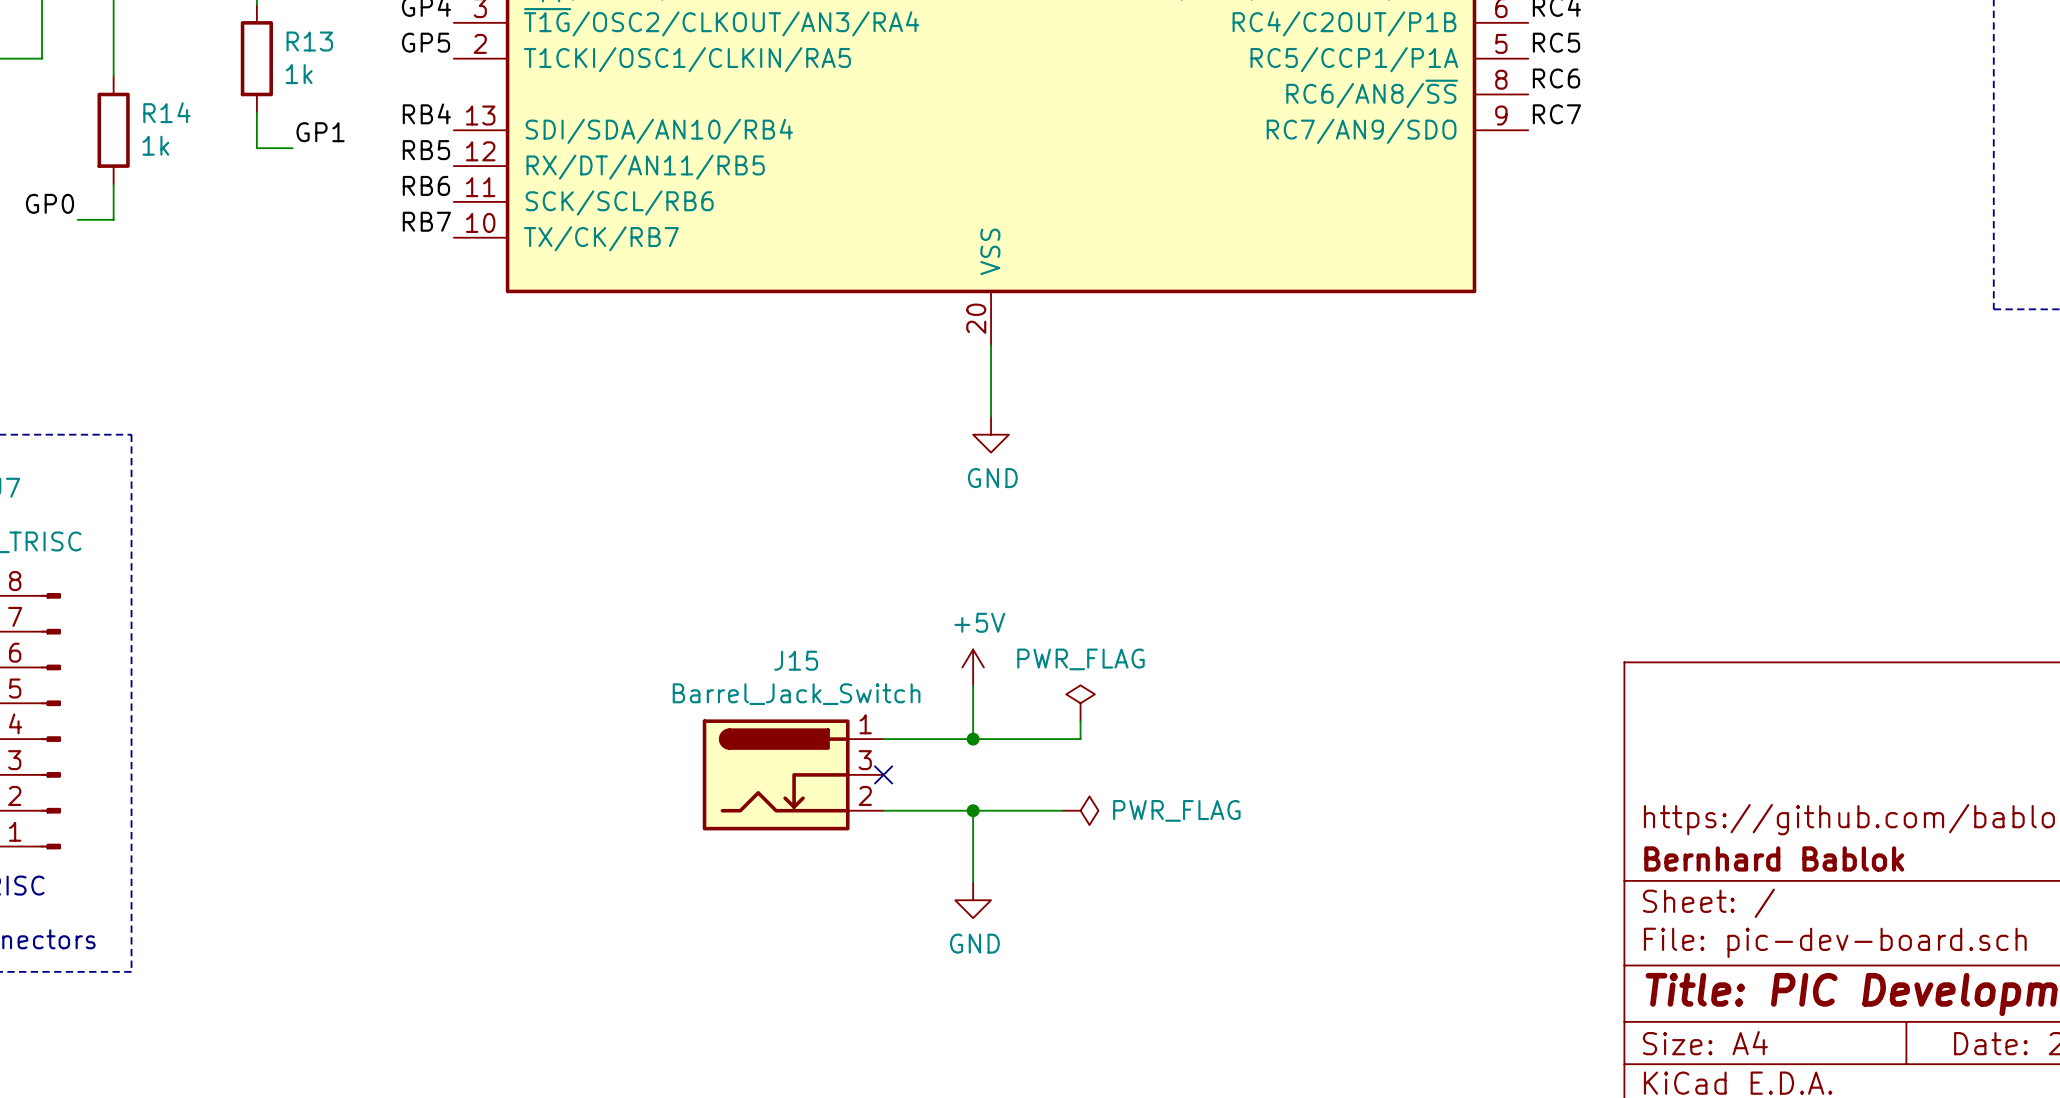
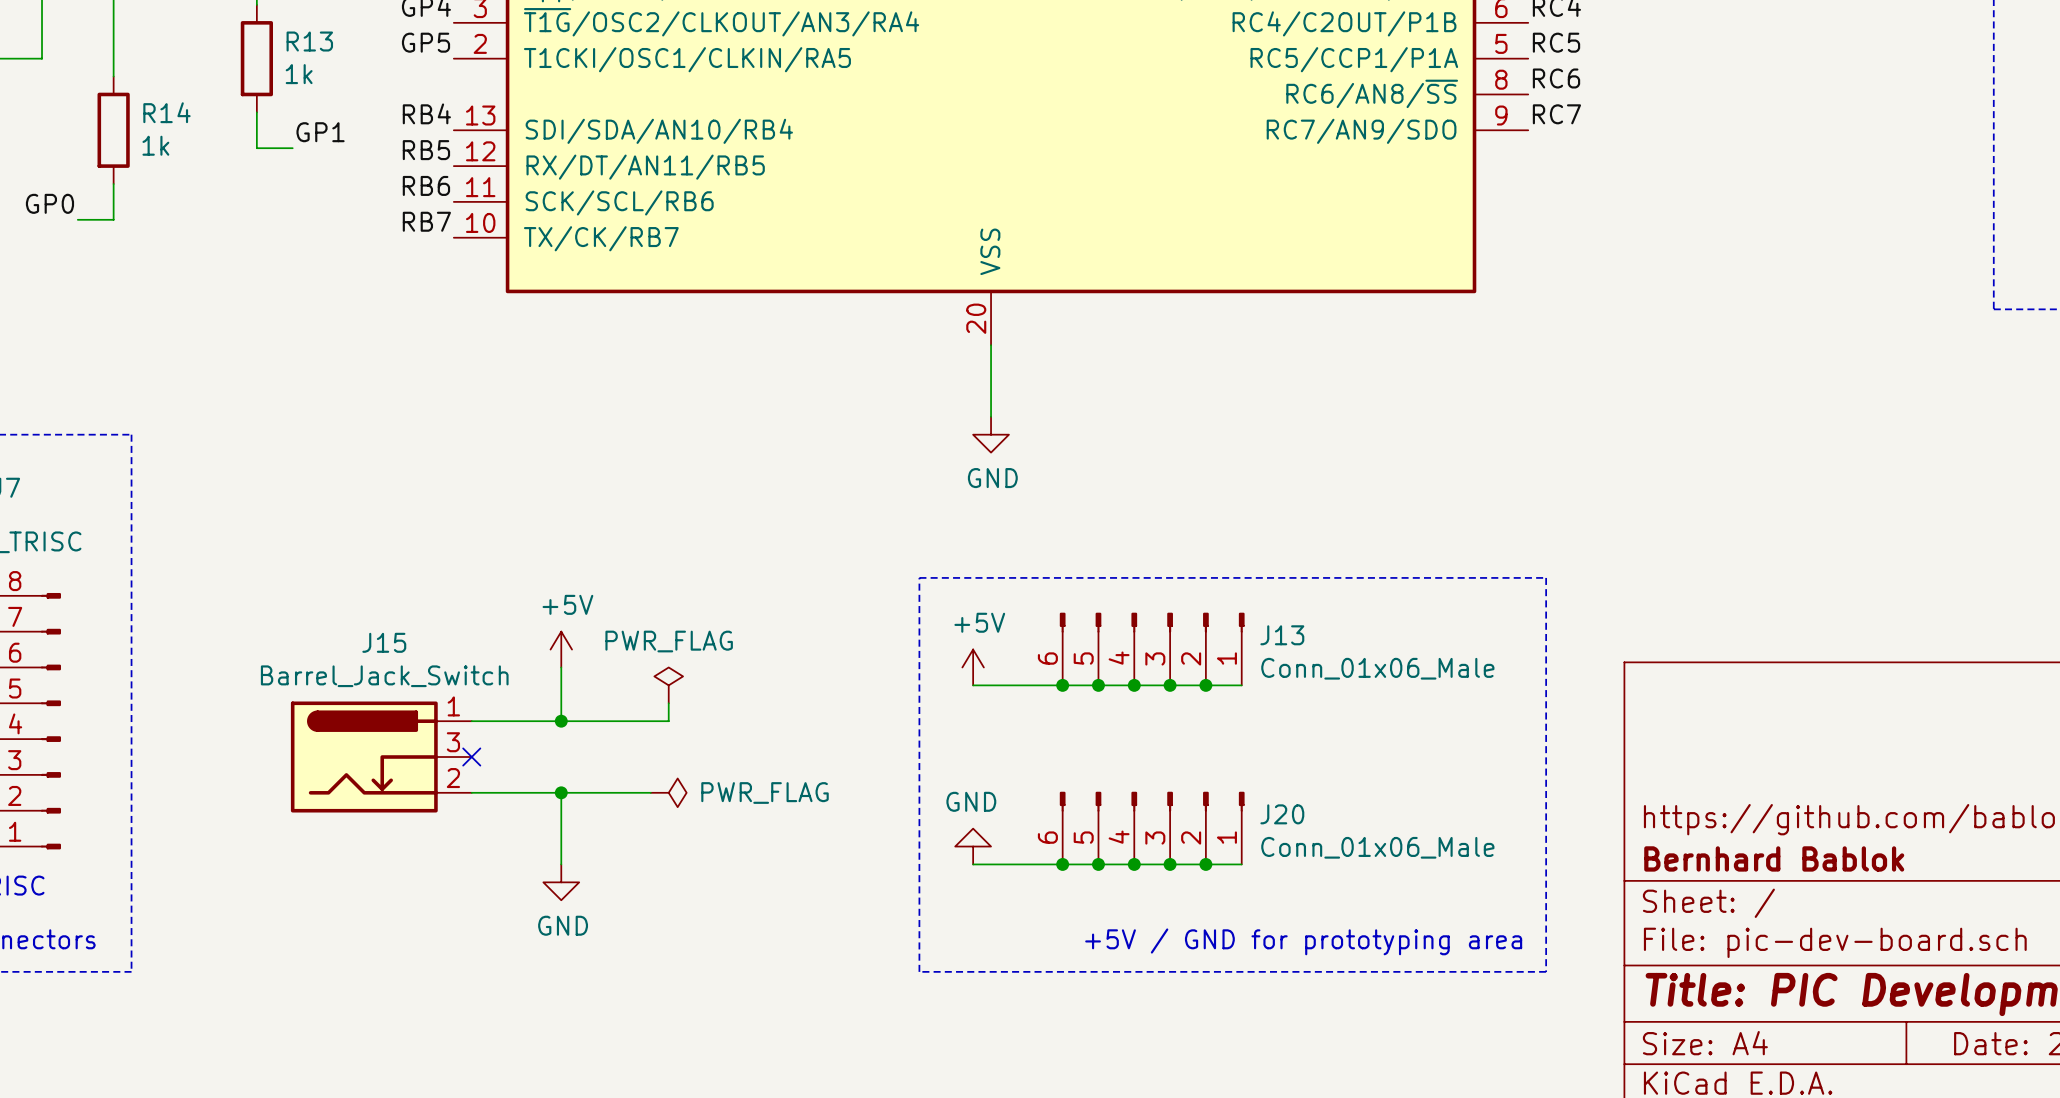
line: none -> (919, 577) (1546, 577) (1546, 971) (919, 971) (919, 577)
power symbol: none -> +5V (561, 649)
J13: none -> Conn_01x06_Male (1152, 649)
wire: none -> (561, 667) (561, 721)
power symbol: none -> PWR_FLAG (668, 685)
wire: (973, 685) (973, 739) -> (973, 685) (1241, 685)
junction: none -> (1062, 685)
junction: none -> (1098, 685)
junction: none -> (1134, 685)
junction: none -> (1170, 685)
junction: none -> (1205, 685)
wire: none -> (668, 703) (668, 721) (471, 721)
power symbol: PWR_FLAG (1080, 703) -> none
junction: none -> (561, 721)
wire: (1080, 721) (1080, 739) (883, 739) -> none
junction: (973, 739) -> none
no-connect mark: none -> (471, 757)
J15 position: (793, 774) -> (381, 757)
no-connect mark: (883, 774) -> none
wire: none -> (471, 792) (650, 792)
wire: none -> (561, 792) (561, 864)
junction: none -> (561, 792)
power symbol: none -> PWR_FLAG (668, 792)
wire: (883, 810) (1062, 810) -> none
wire: (973, 810) (973, 882) -> none
junction: (973, 810) -> none
power symbol: PWR_FLAG (1080, 810) -> none
J20: none -> Conn_01x06_Male (1152, 828)
wire: none -> (973, 864) (1241, 864)
junction: none -> (1062, 864)
junction: none -> (1098, 864)
junction: none -> (1134, 864)
junction: none -> (1170, 864)
junction: none -> (1205, 864)
power symbol: none -> GND (561, 882)
power symbol rotation: 0° (973, 900) -> 180° (973, 846)
power symbol position: GND (973, 900) -> GND (973, 846)
text: none -> +5V / GND for prototyping area (1303, 941)

